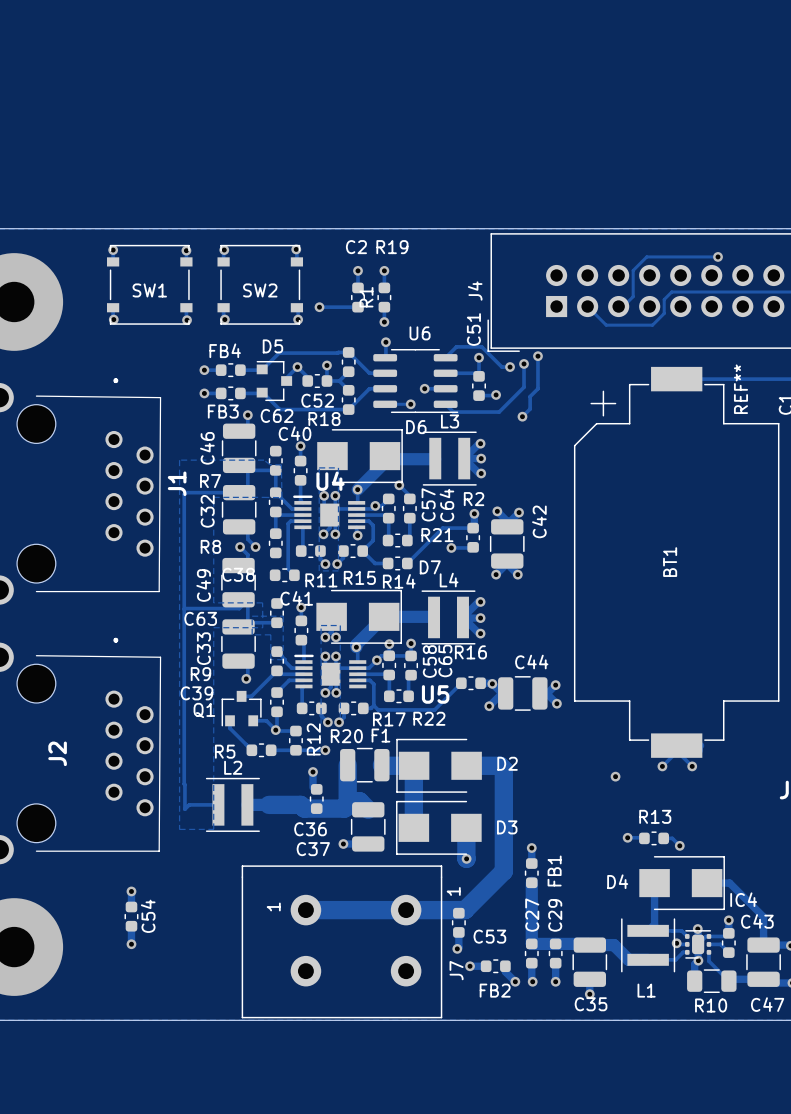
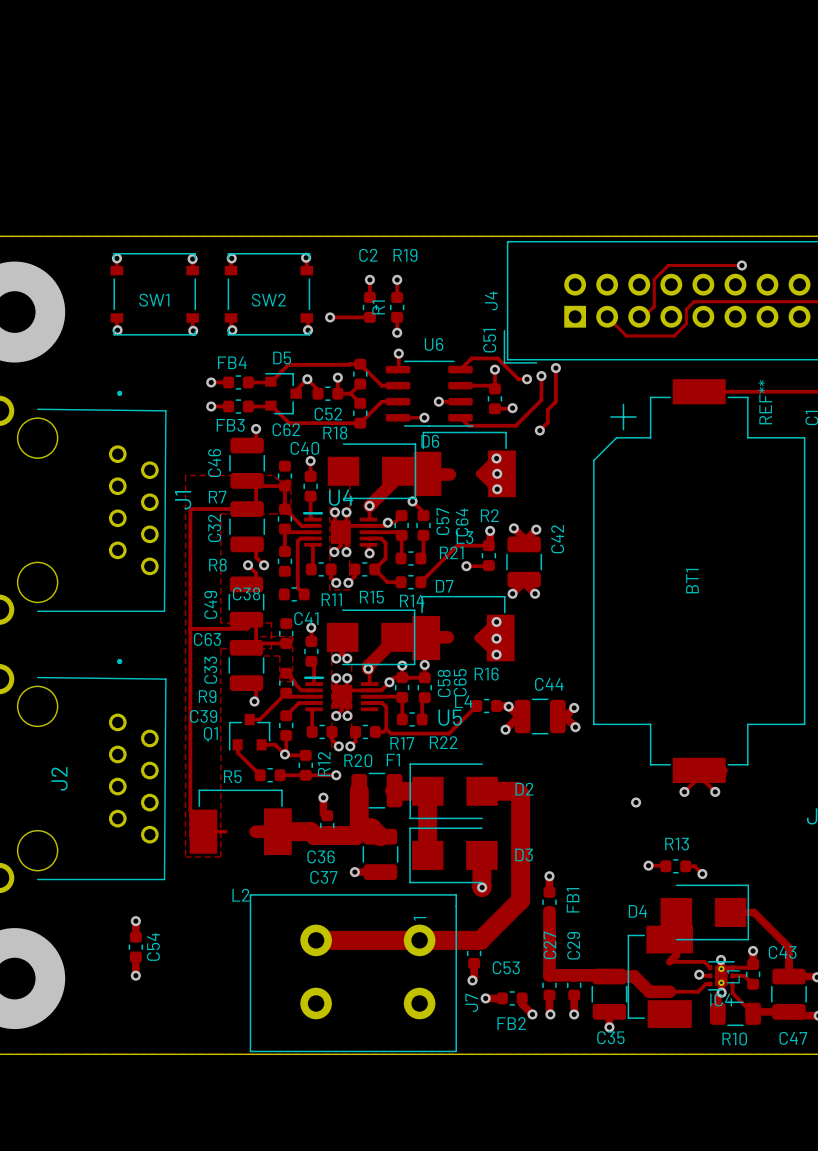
L3 name position: L3 (450, 421) -> L3 (464, 537)
L3 footprint: [422, 431, 477, 486] -> [413, 431, 516, 498]
L4 name position: L4 (449, 580) -> L4 (463, 701)
L4 footprint: [421, 590, 476, 645] -> [412, 595, 515, 662]
L2 name position: L2 (233, 767) -> L2 (240, 895)
L2 footprint: [205, 777, 260, 832] -> [189, 789, 292, 856]
J7 text: 1 (453, 891) -> none
IC4 name position: IC4 (743, 899) -> IC4 (721, 999)
J7 text position: 1 (273, 906) -> 1 (420, 918)
L1 footprint: [621, 918, 676, 973] -> [627, 925, 694, 1028]
IC4 footprint: [684, 930, 712, 959] -> [707, 961, 735, 991]
L1 name position: L1 (646, 990) -> L1 (733, 976)

